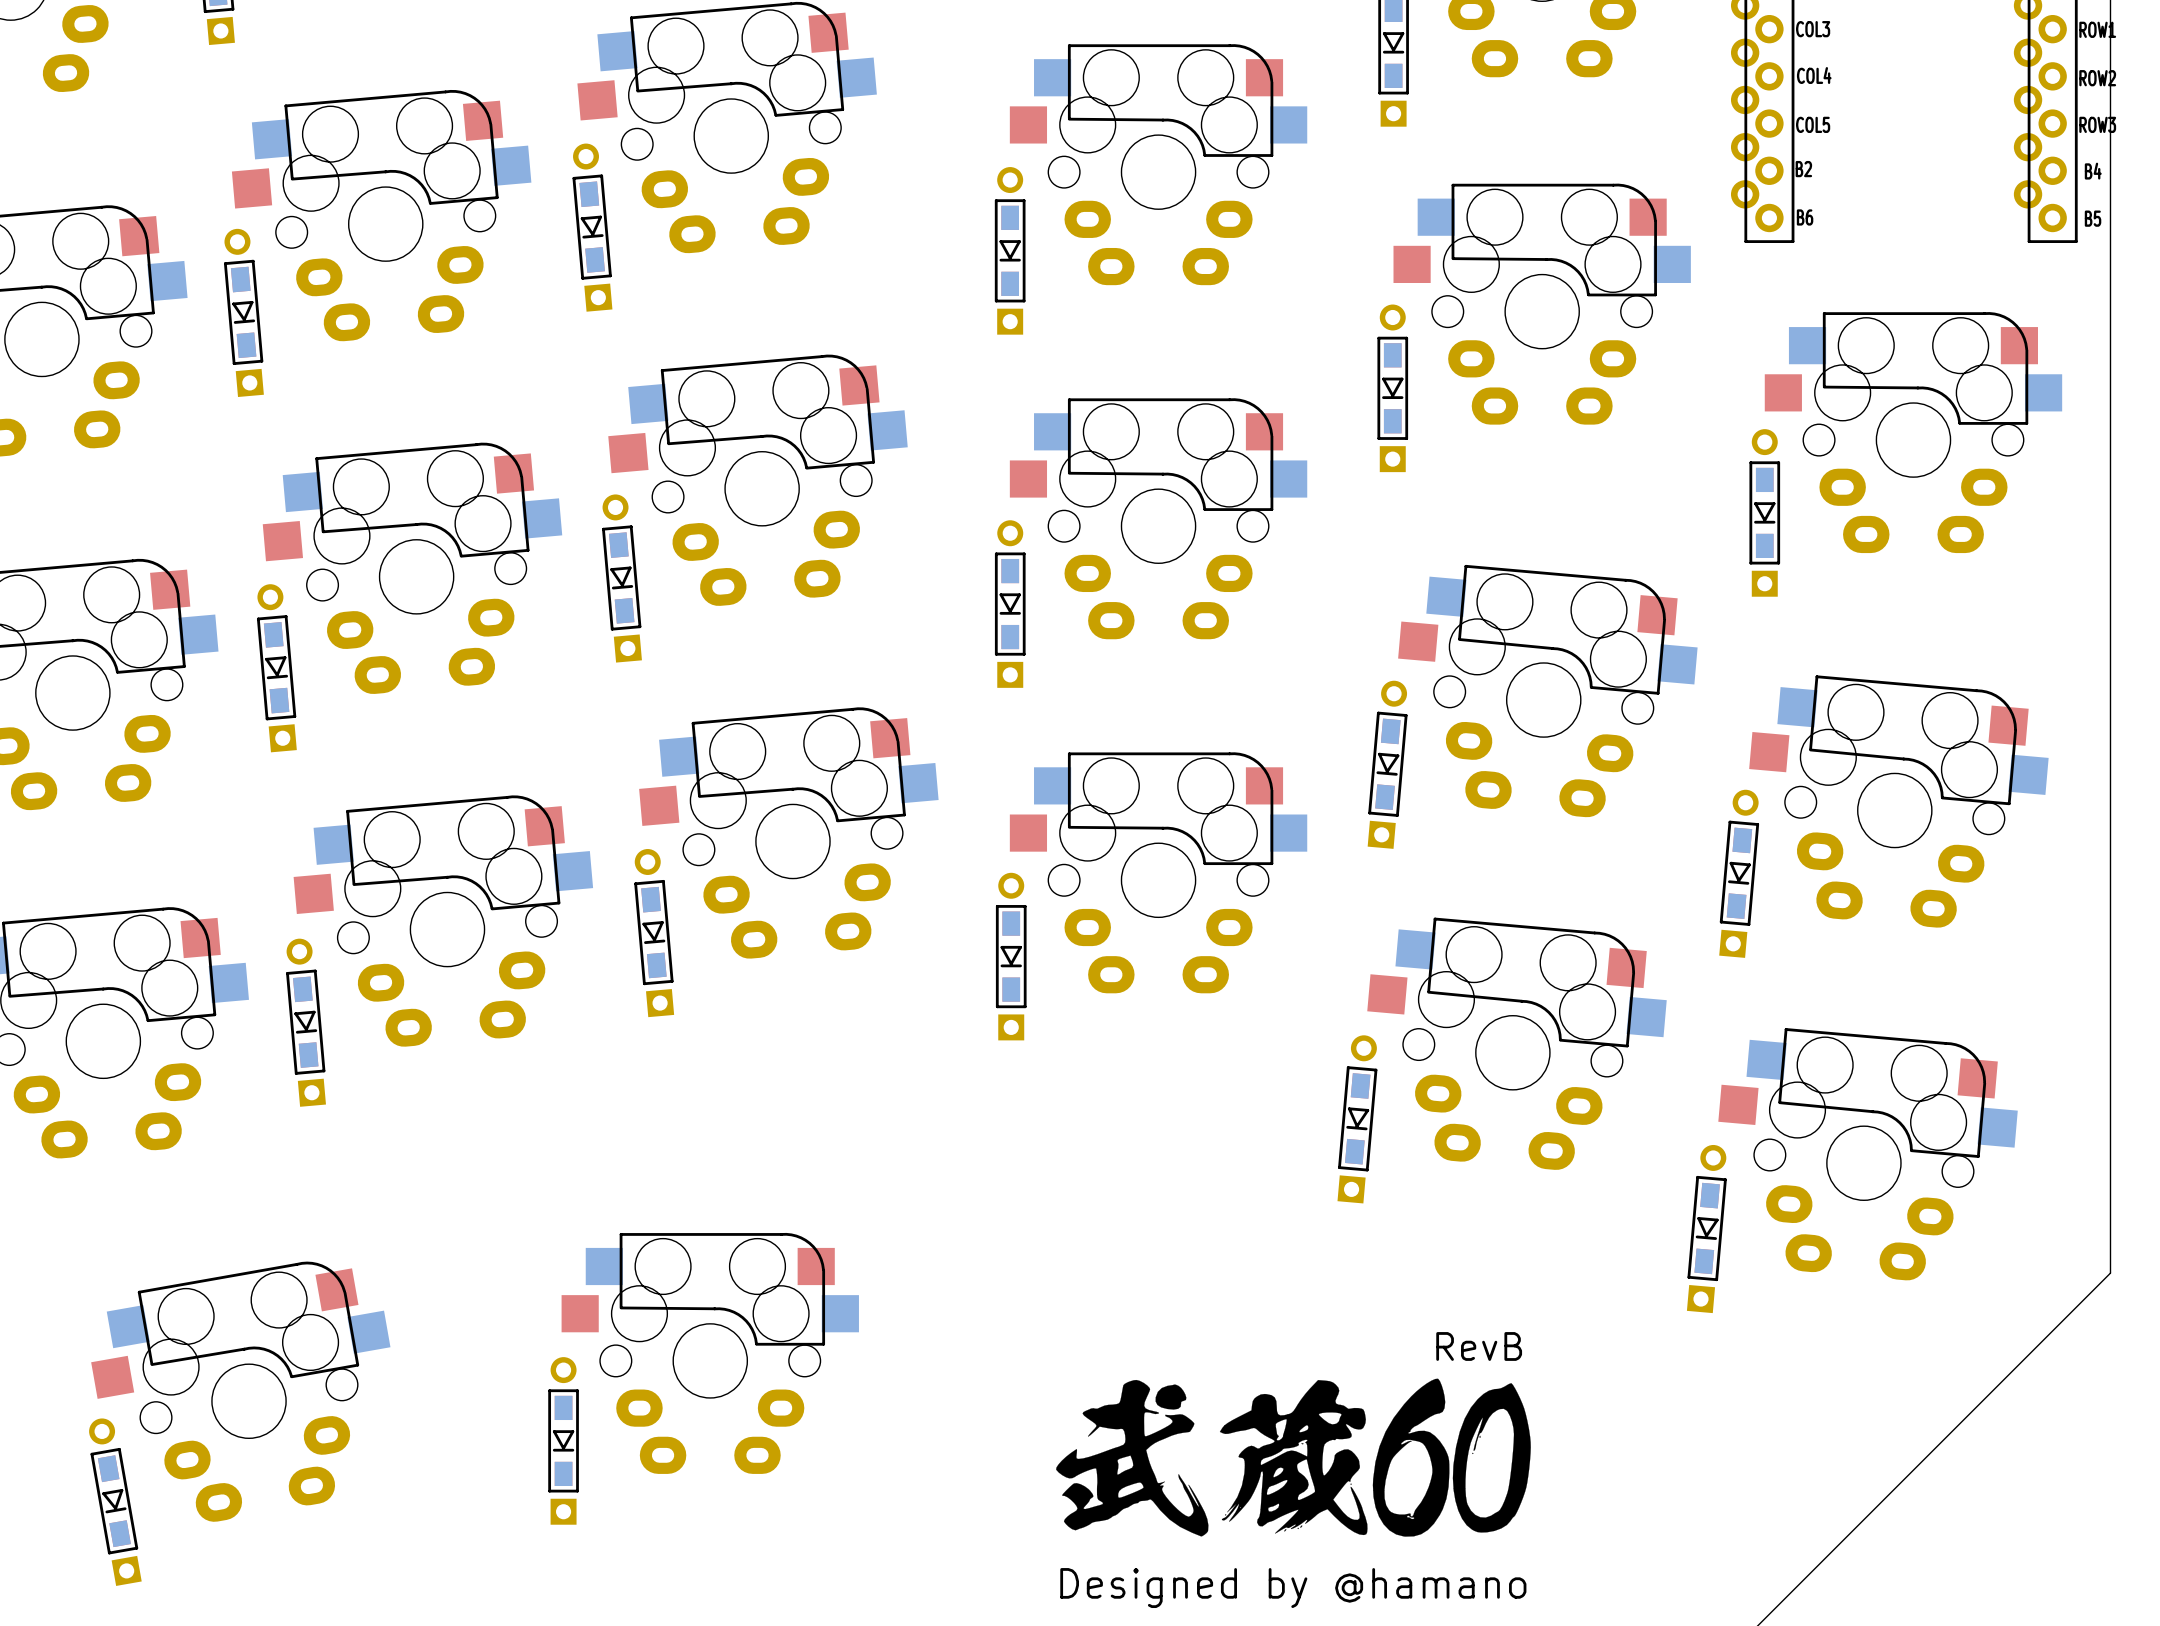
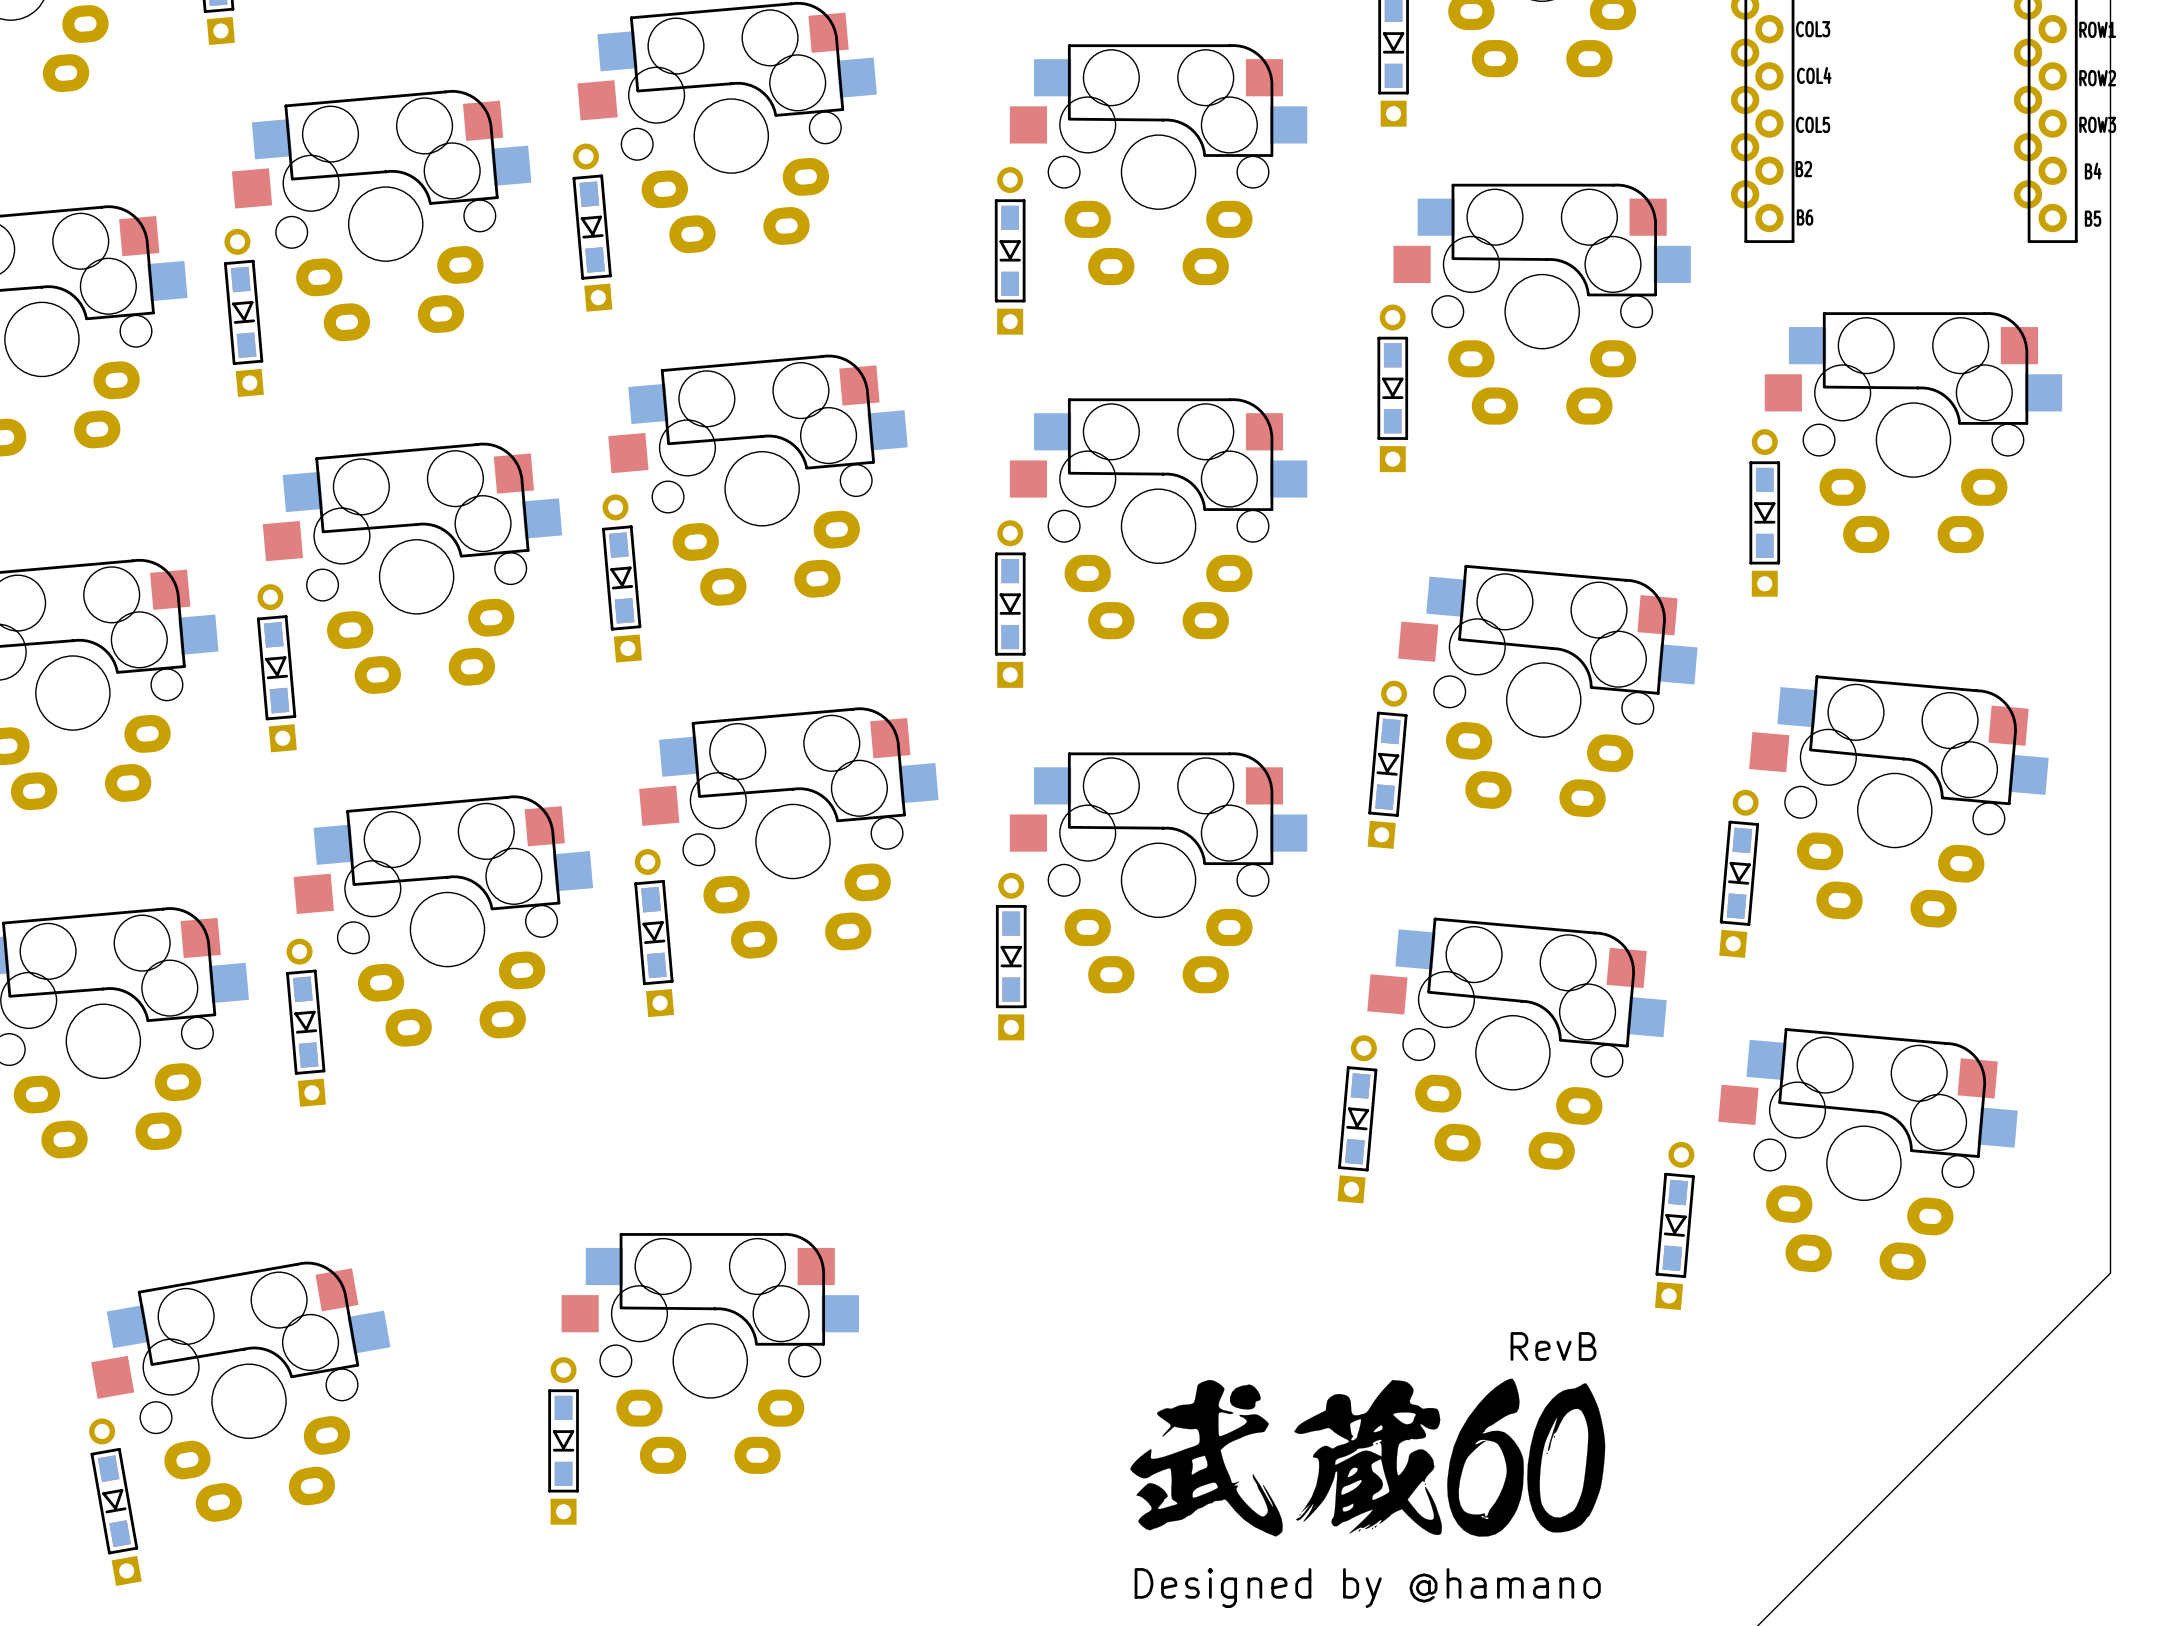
part position: (1706, 1229) -> (1674, 1225)
text position: RevB (1479, 1346) -> RevB (1553, 1346)
drawing position: (1293, 1457) -> (1367, 1457)
text position: Designed by @hamano (1293, 1588) -> Designed by @hamano (1367, 1588)

